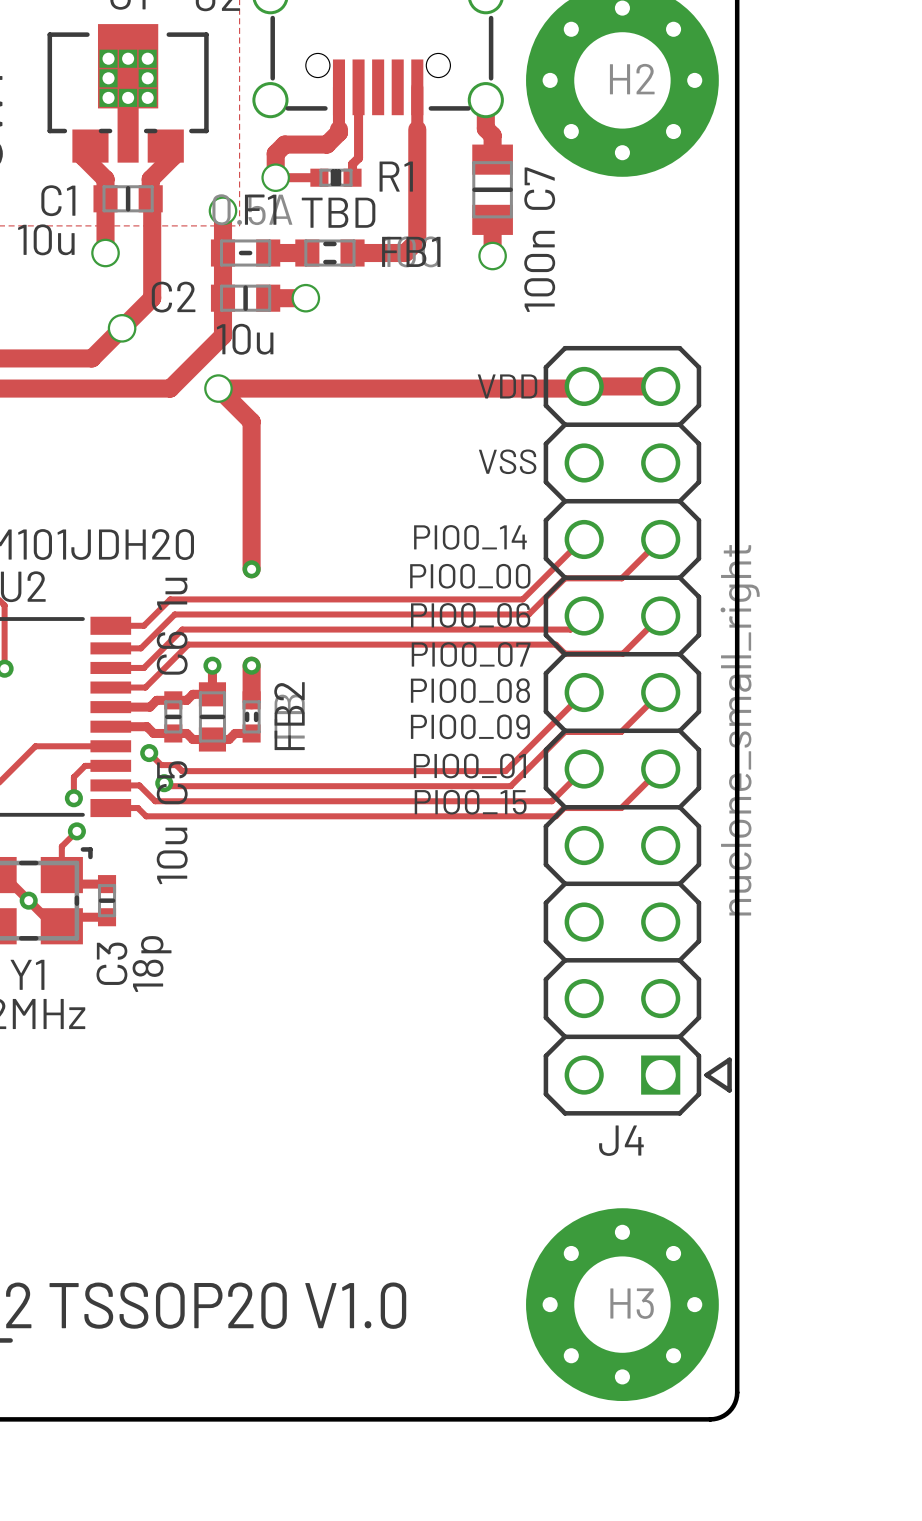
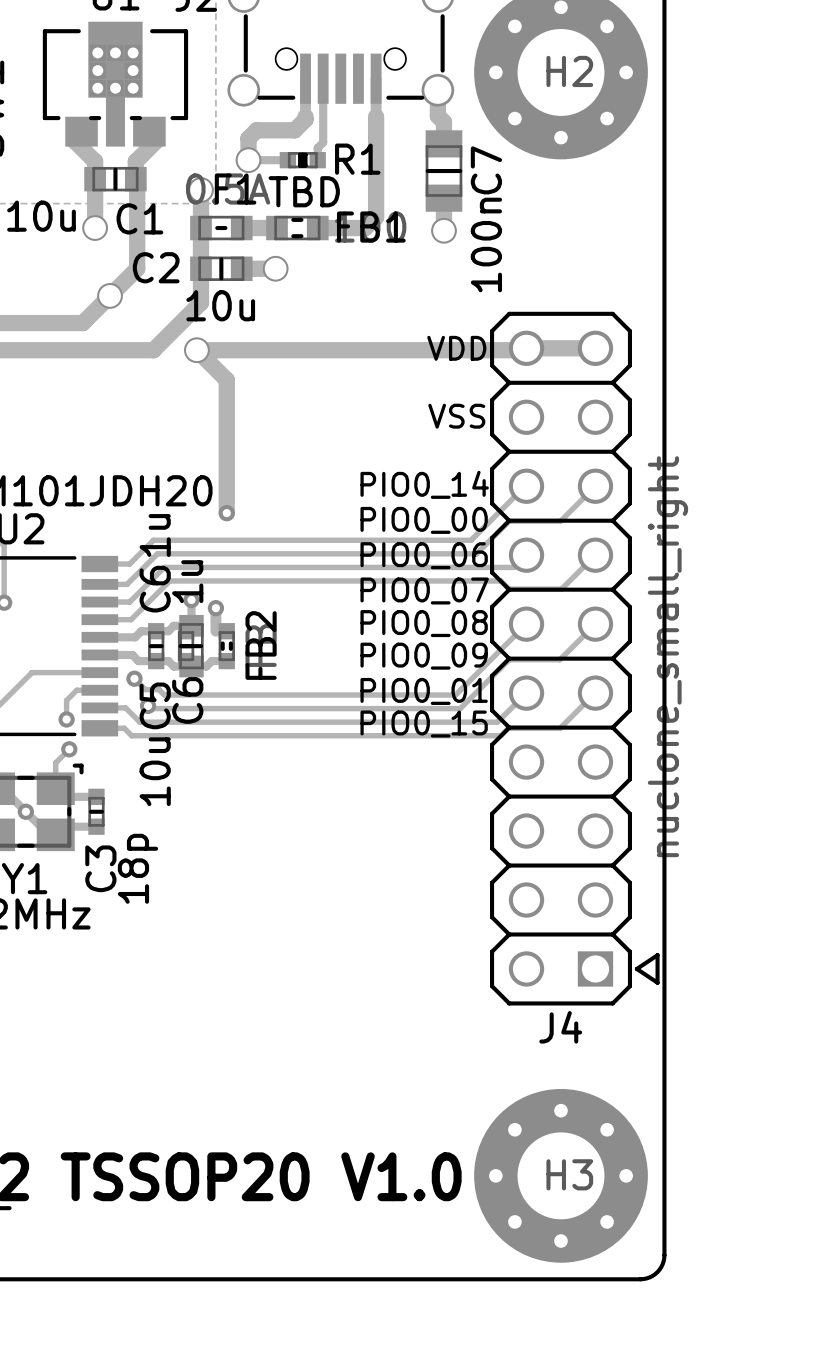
C1 name position: C1 (58, 200) -> C1 (139, 218)
track: (251, 665) (251, 700) -> none
via position: (251, 665) -> (215, 608)
track: none -> (215, 608) (215, 631)
C6: none -> 1u (186, 646)

